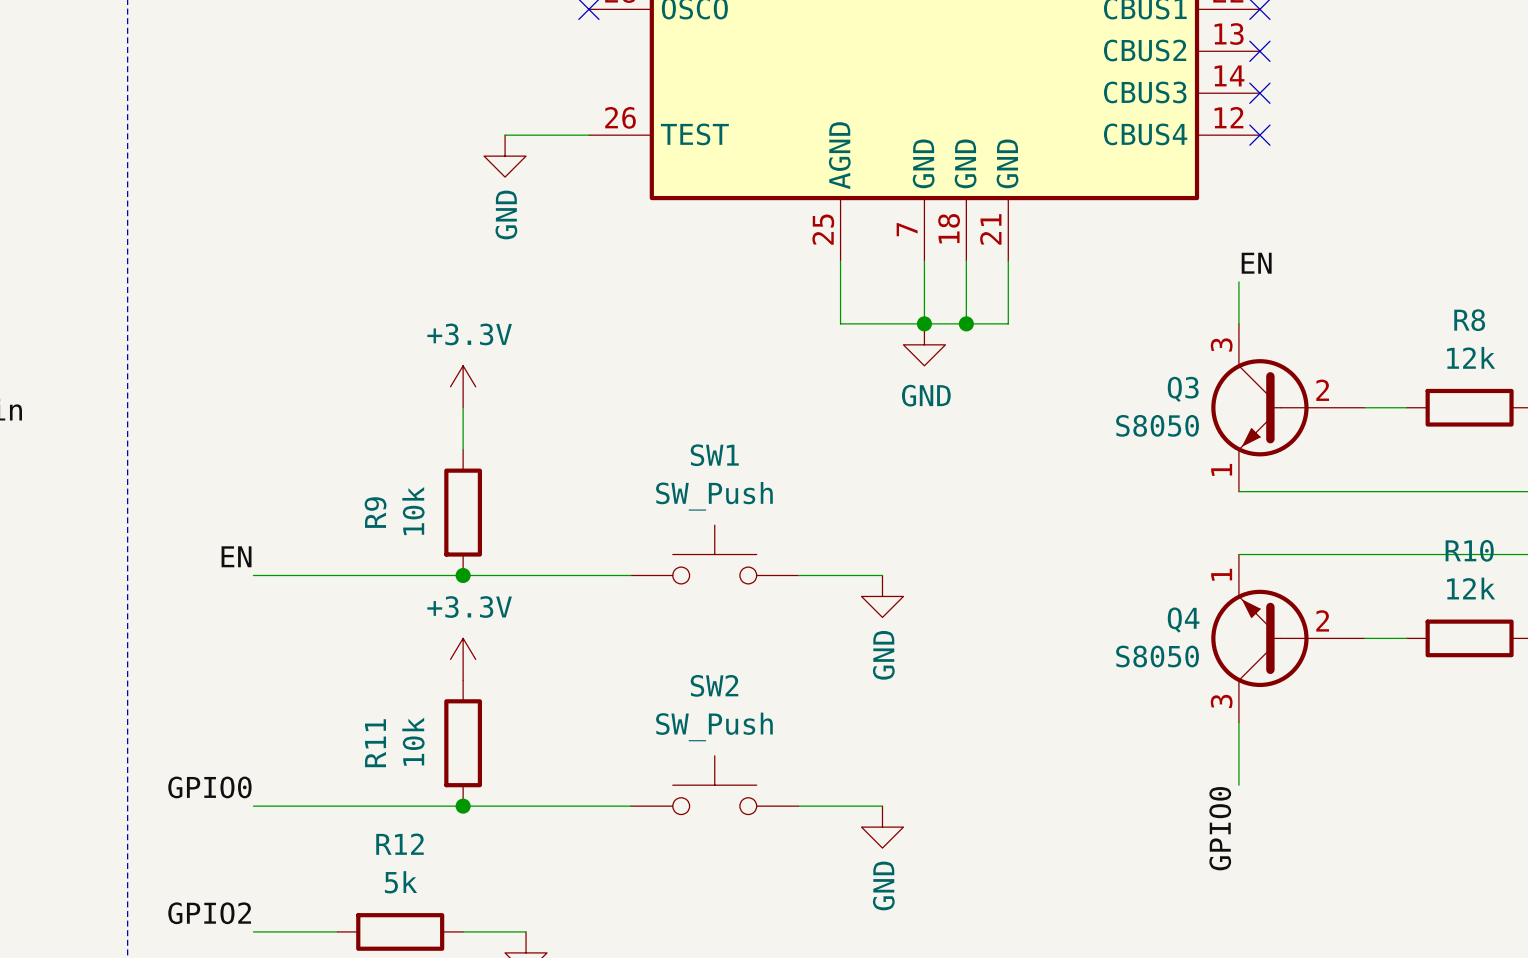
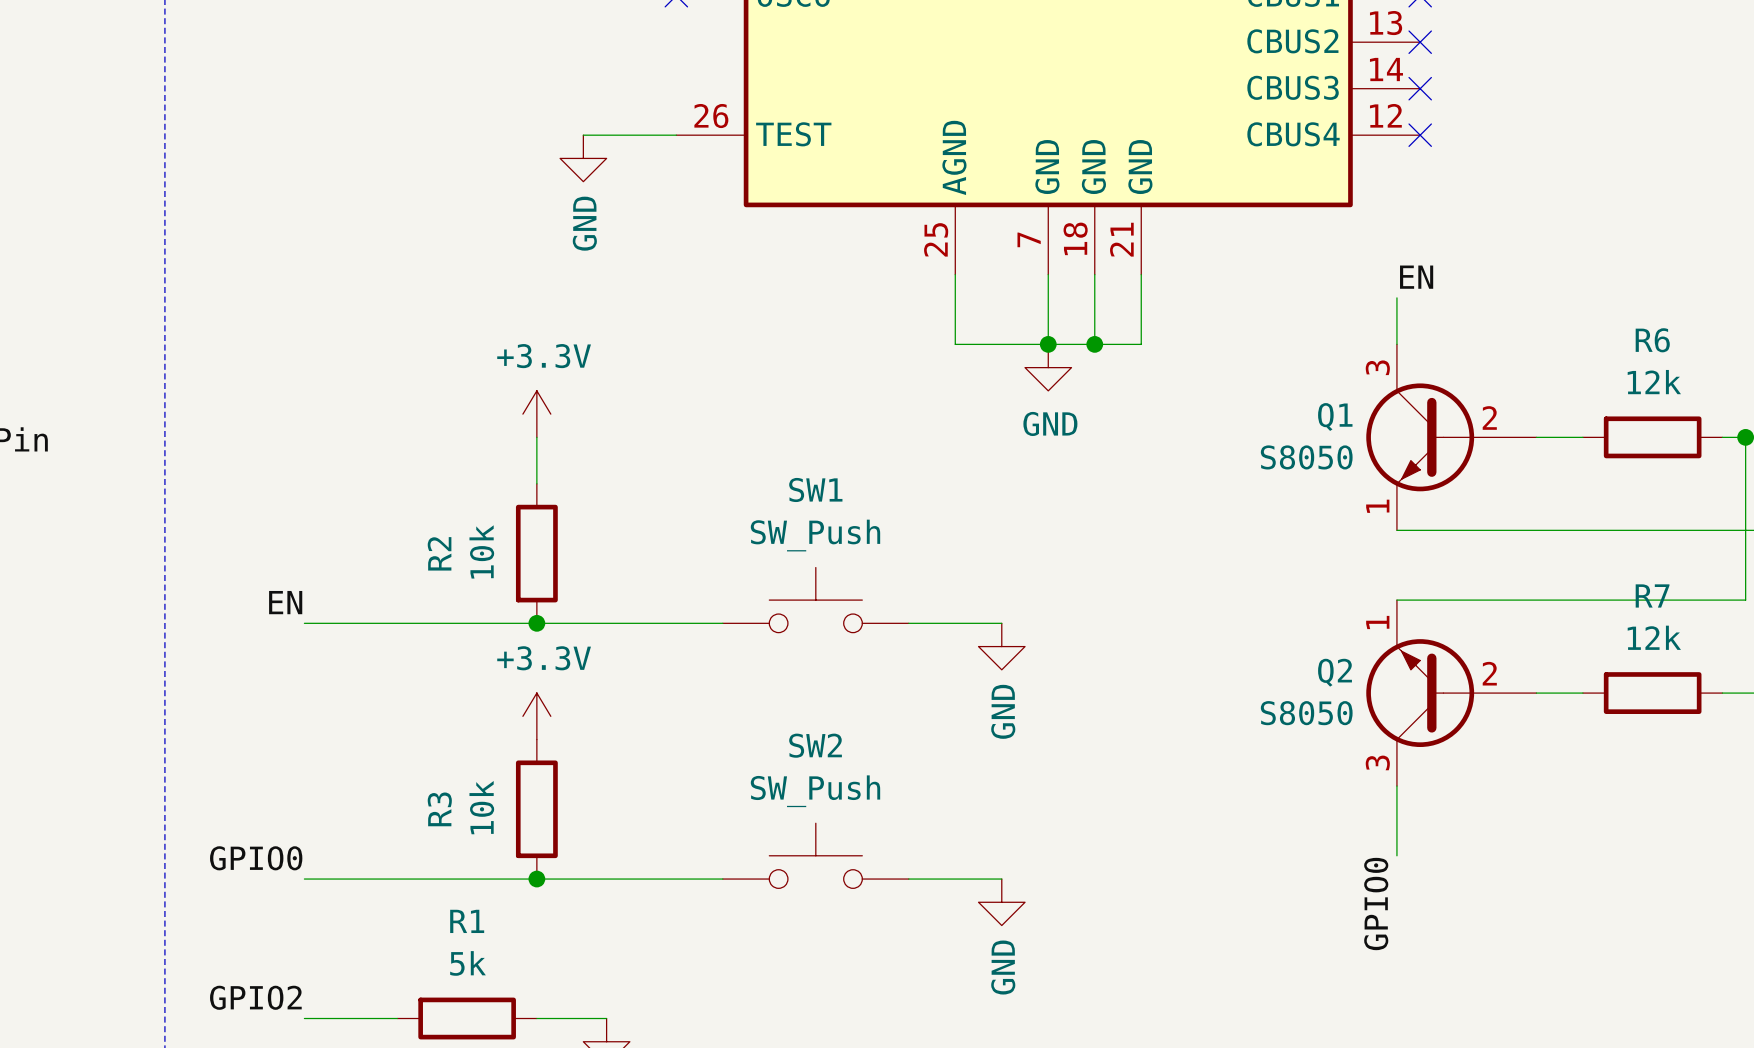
R8 name: R8 (1469, 320) -> R6 (1652, 340)
Q3 name: Q3 (1183, 389) -> Q1 (1335, 417)
R9 name: R9 (375, 512) -> R2 (439, 553)
R10 name: R10 (1469, 550) -> R7 (1652, 595)
Q4 name: Q4 (1183, 620) -> Q2 (1335, 672)
R11 name: R11 (375, 743) -> R3 (439, 809)
R12 name: R12 (400, 844) -> R1 (467, 921)

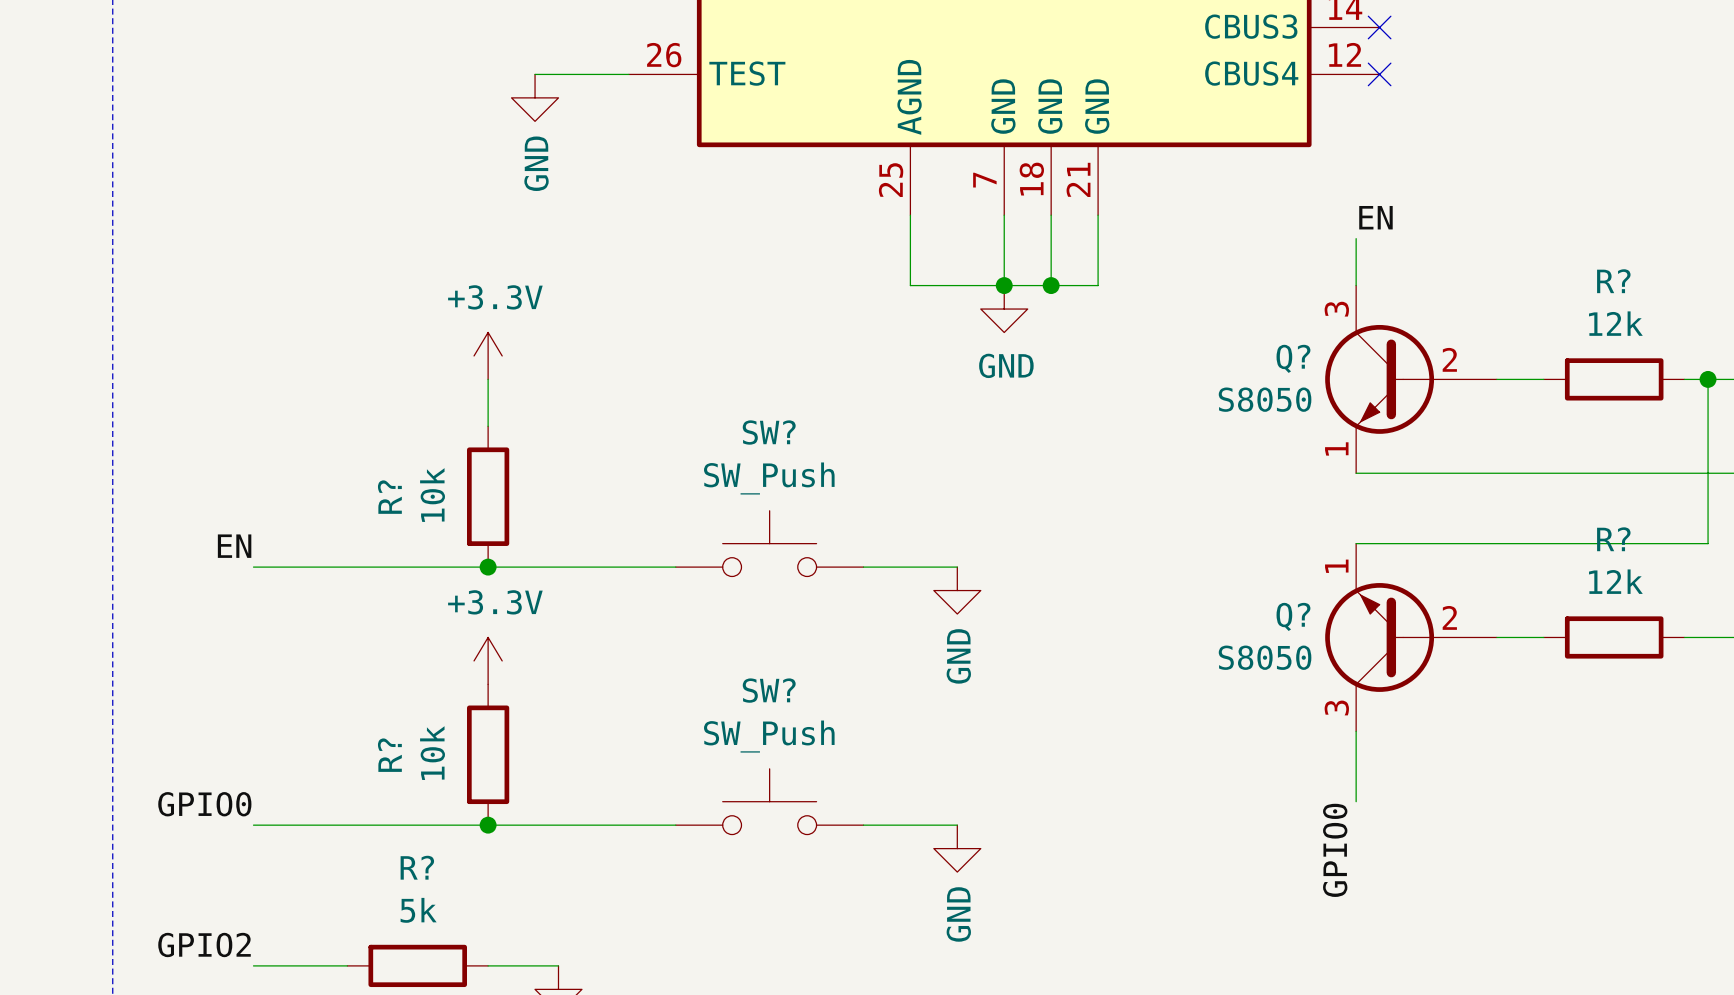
R6 name: R6 (1652, 340) -> R? (1613, 281)
Q1 name: Q1 (1335, 417) -> Q? (1293, 358)
SW1 name: SW1 (815, 489) -> SW? (769, 432)
R2 name: R2 (439, 553) -> R? (389, 497)
R7 name: R7 (1652, 595) -> R? (1613, 539)
Q2 name: Q2 (1335, 672) -> Q? (1293, 616)
SW2 name: SW2 (815, 745) -> SW? (769, 690)
R3 name: R3 (439, 809) -> R? (389, 755)
R1 name: R1 (467, 921) -> R? (417, 867)

